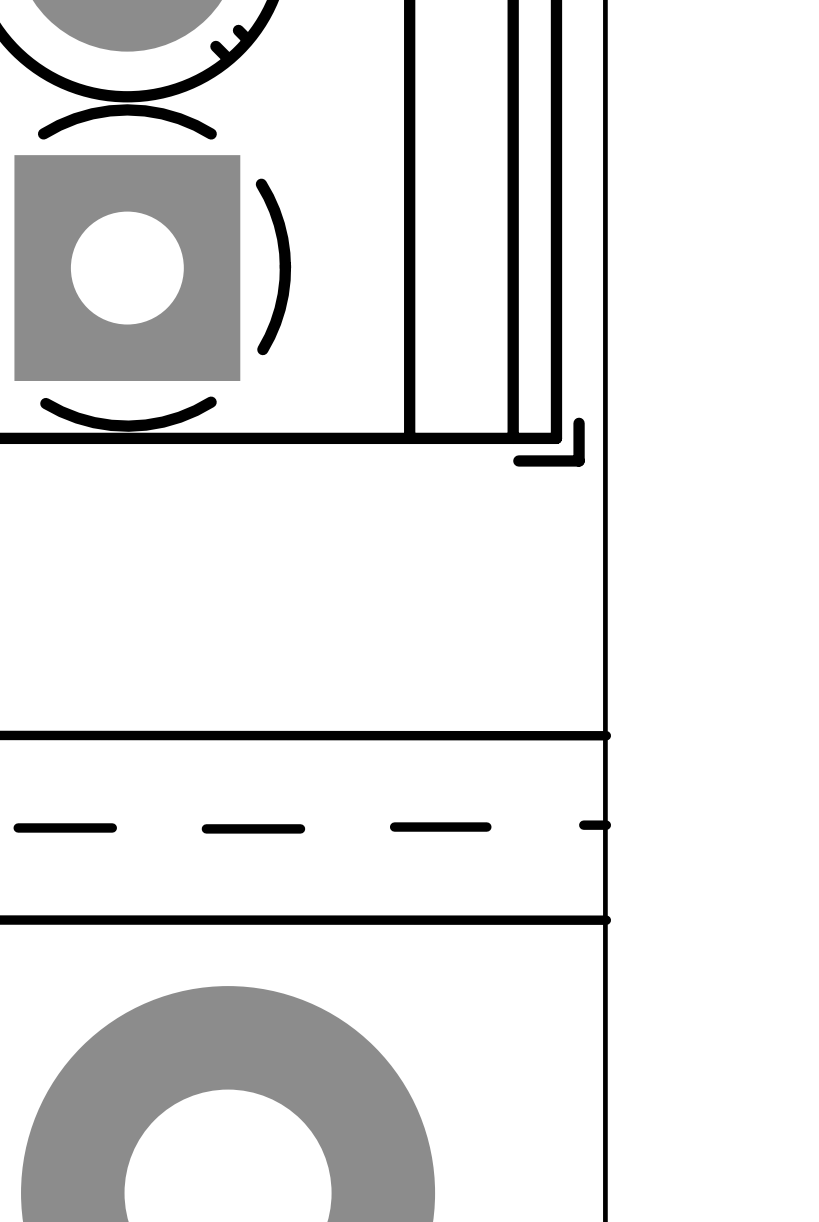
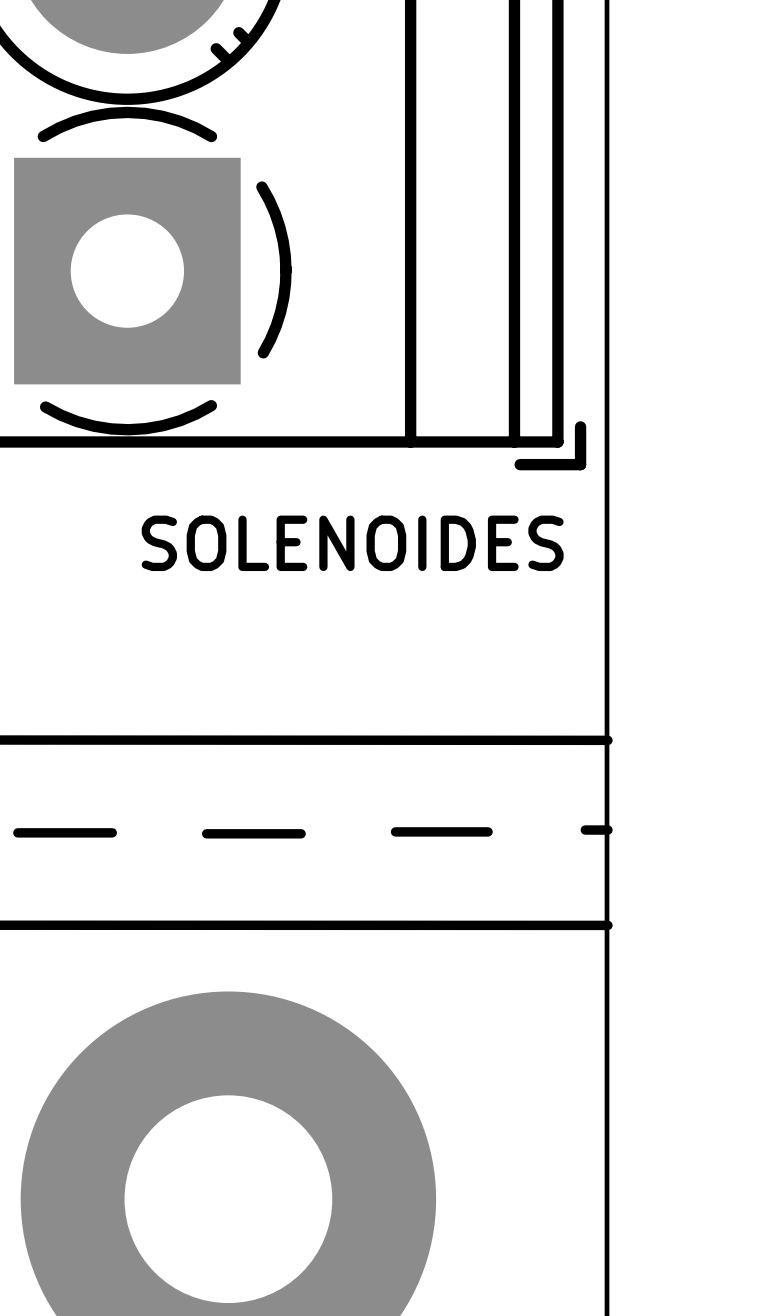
part value: none -> SOLENOIDES (352, 543)

